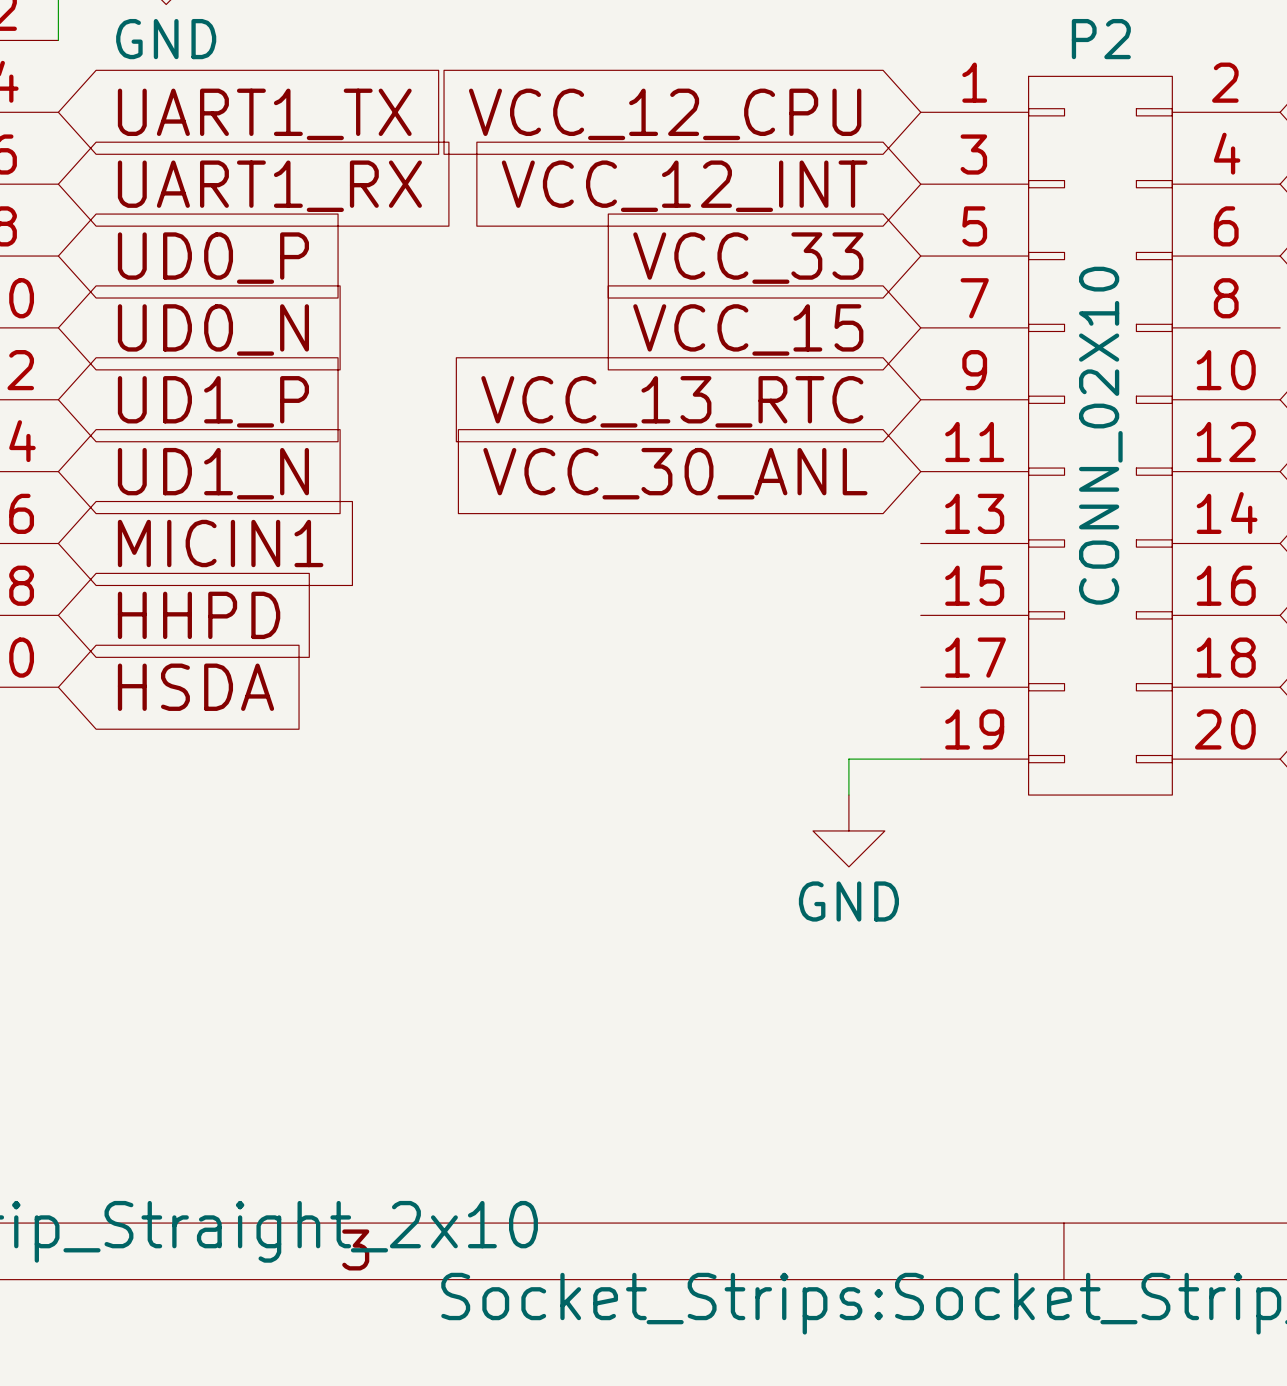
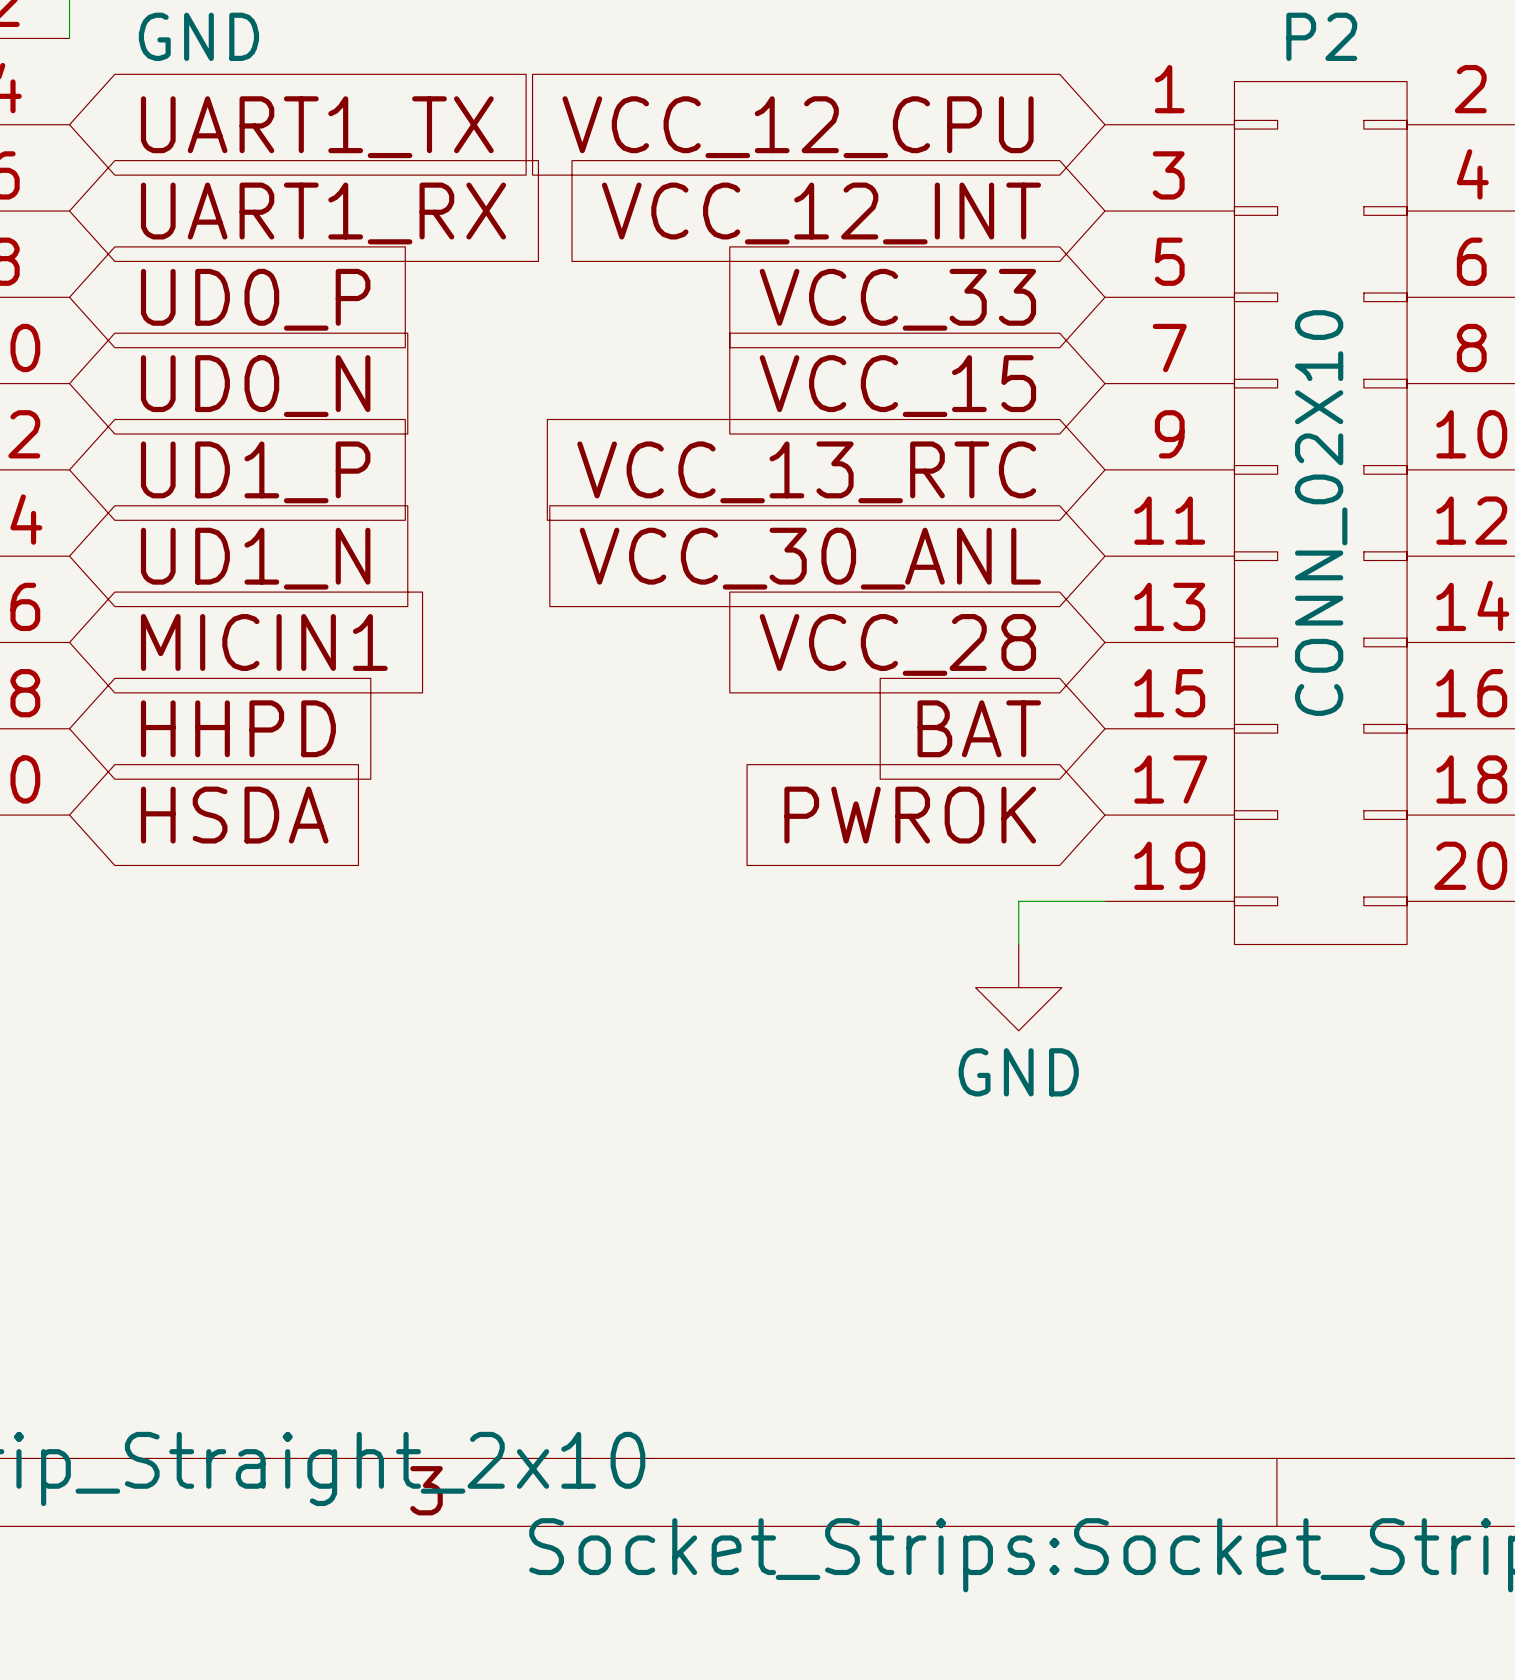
global label: none -> VCC_28 (897, 644)
global label: none -> BAT (979, 728)
global label: none -> PWROK (910, 815)

